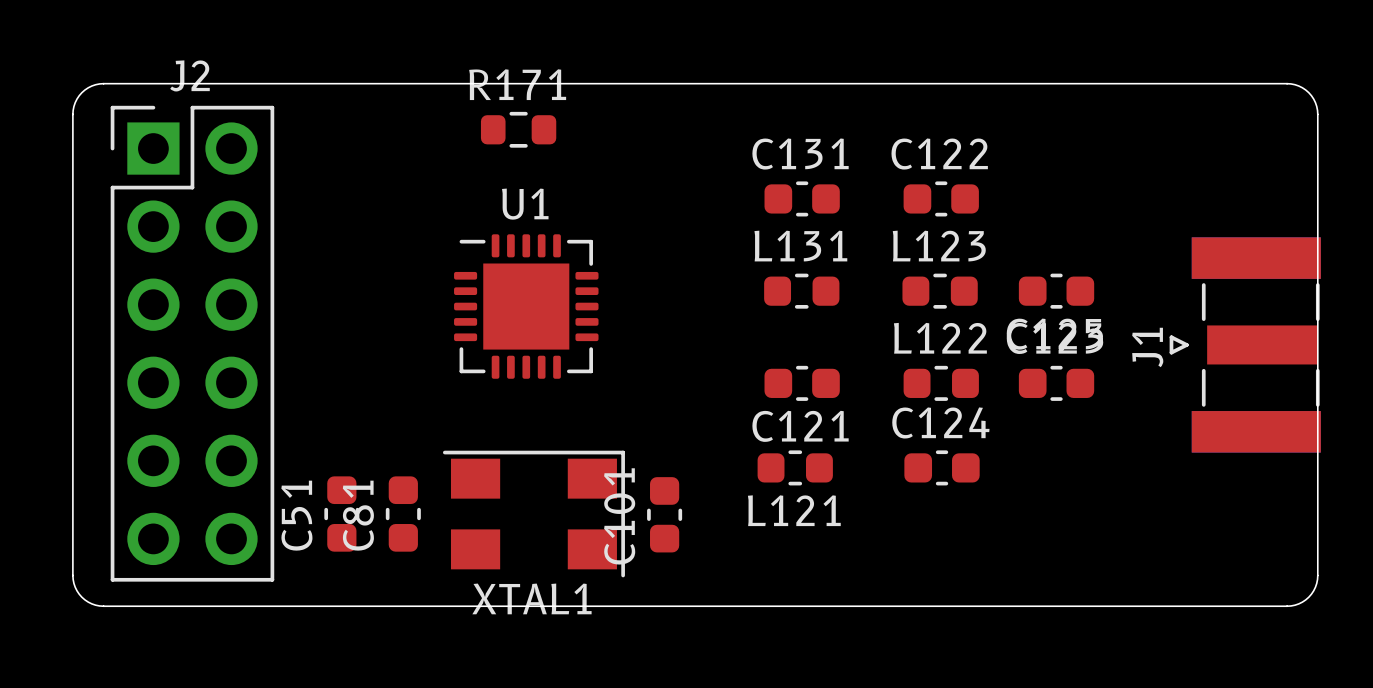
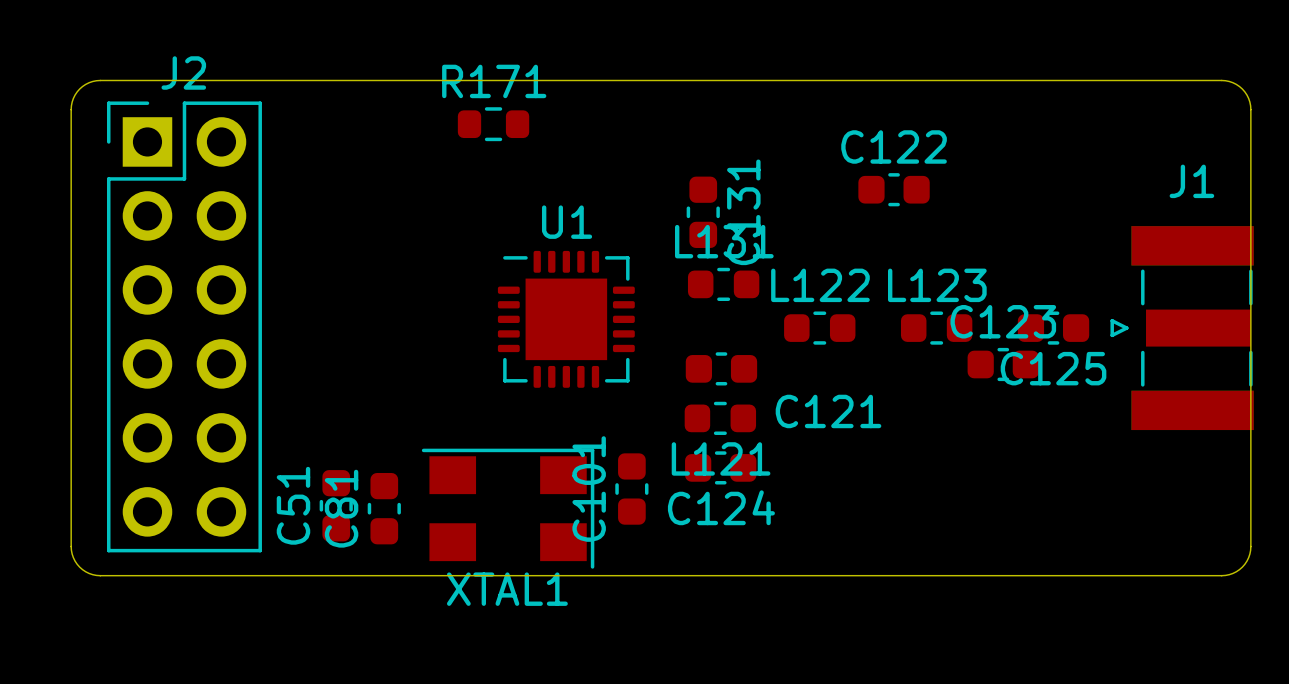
C131 rotation: 0° (802, 198) -> 90° clockwise (703, 212)
C131 position: (802, 198) -> (703, 212)
L131 position: (801, 291) -> (723, 284)
L123 position: (940, 291) -> (936, 328)
C125 position: (1056, 291) -> (1053, 328)
U1 position: (526, 306) -> (566, 319)
J1 name rotation: 0° (1147, 347) -> 90° clockwise (1191, 181)
J1 name position: J1 (1147, 347) -> J1 (1191, 181)
C121 position: (802, 383) -> (721, 368)
L122 position: (941, 383) -> (819, 328)
C124 name position: C124 (940, 422) -> C124 (721, 507)
C121 name position: C121 (800, 426) -> C121 (828, 411)
L121 position: (795, 467) -> (720, 418)
C124 position: (942, 467) -> (720, 467)
C51 position: (341, 514) -> (336, 505)
C81 position: (403, 514) -> (384, 508)
XTAL1 position: (533, 514) -> (508, 508)

